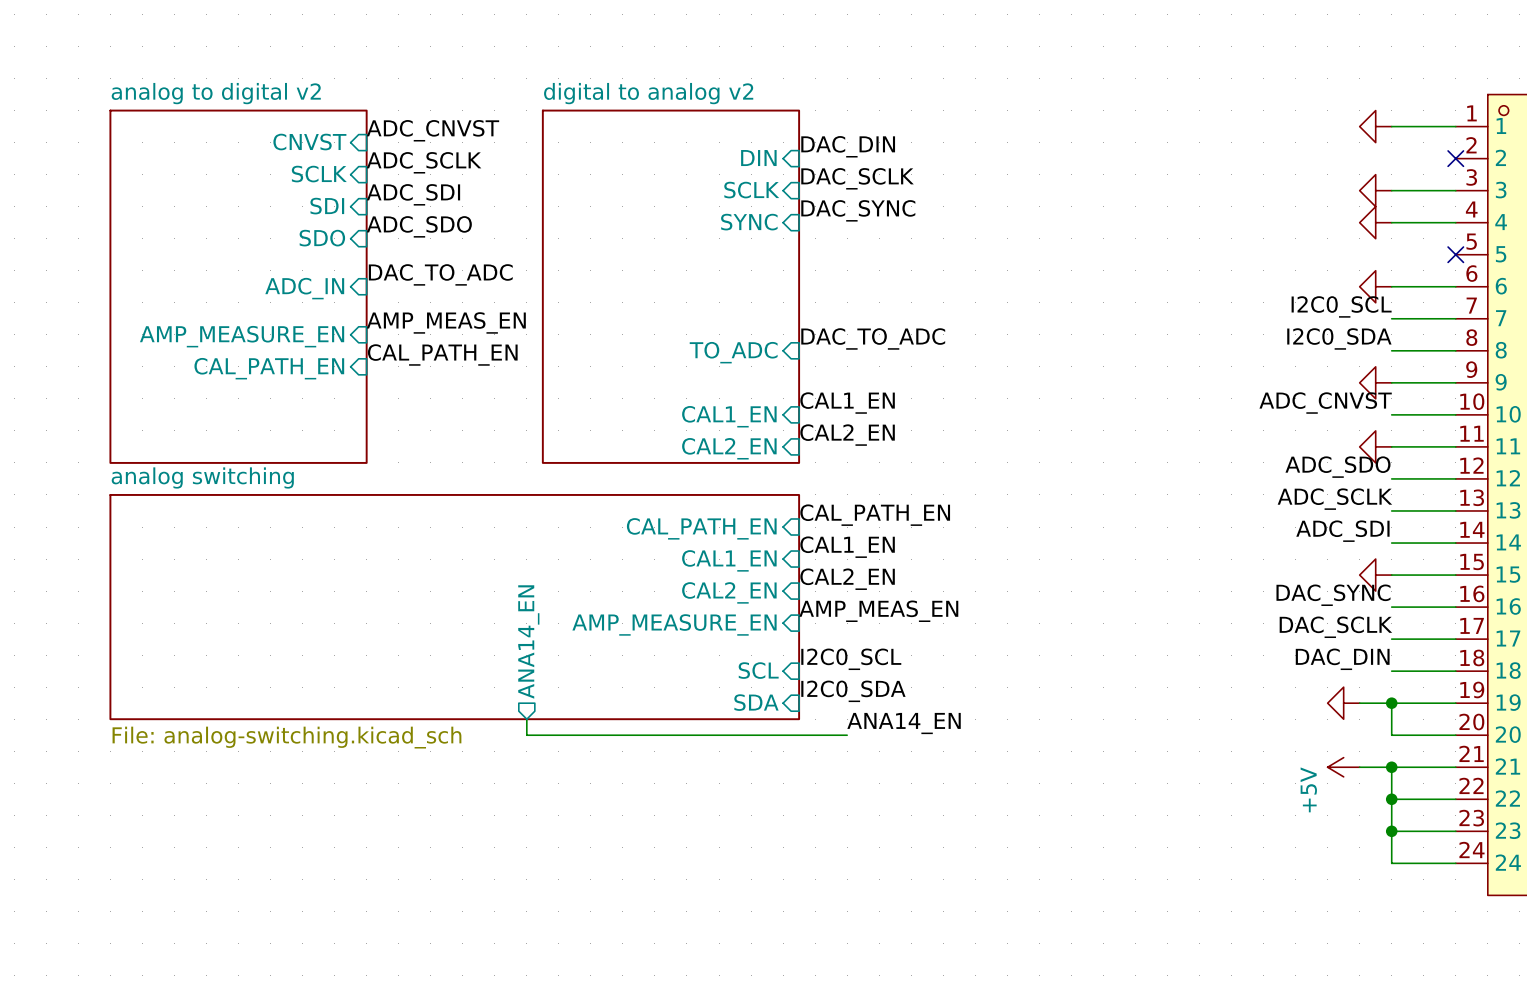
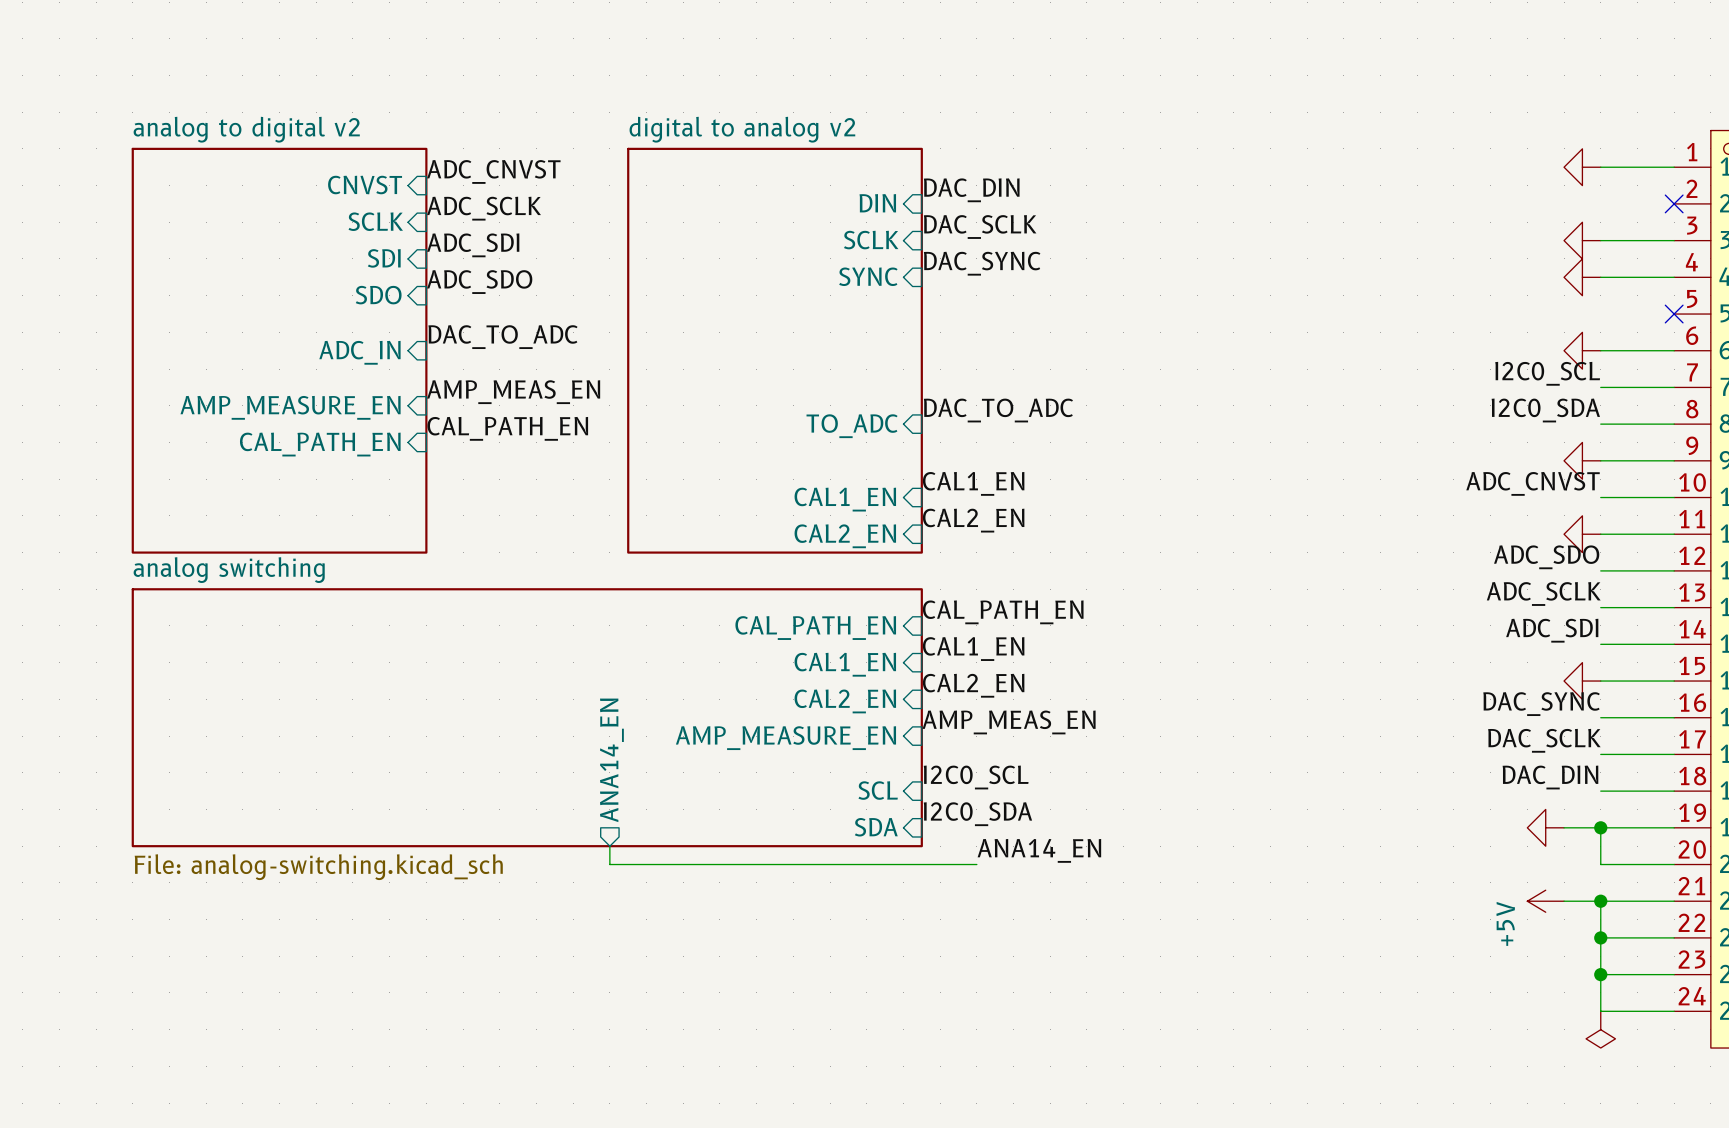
power symbol: none -> (1600, 1029)

